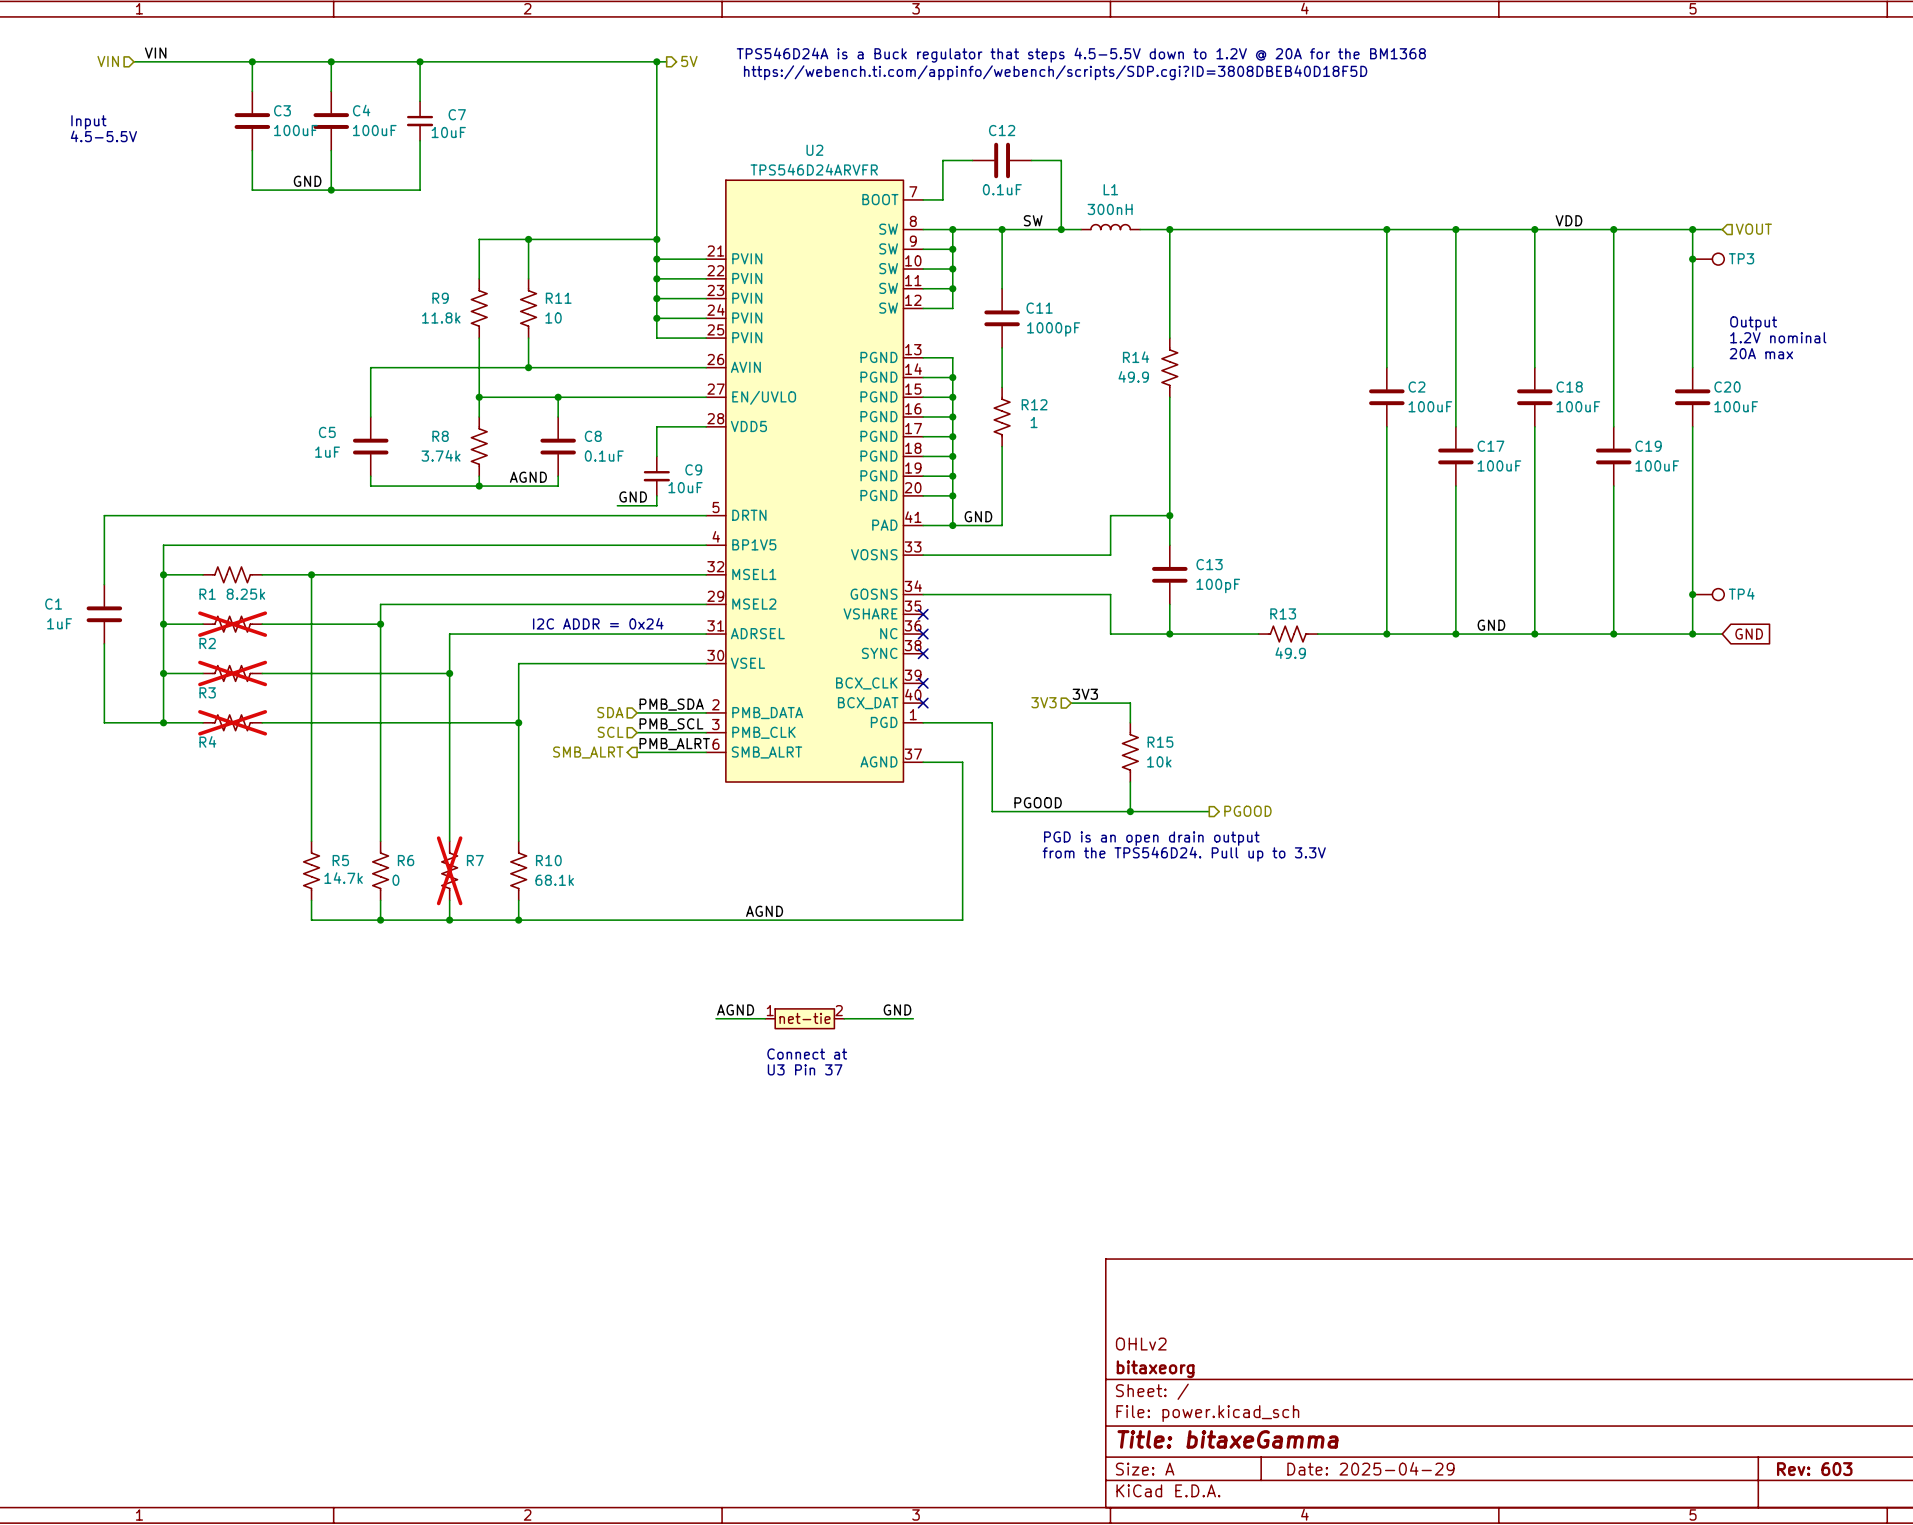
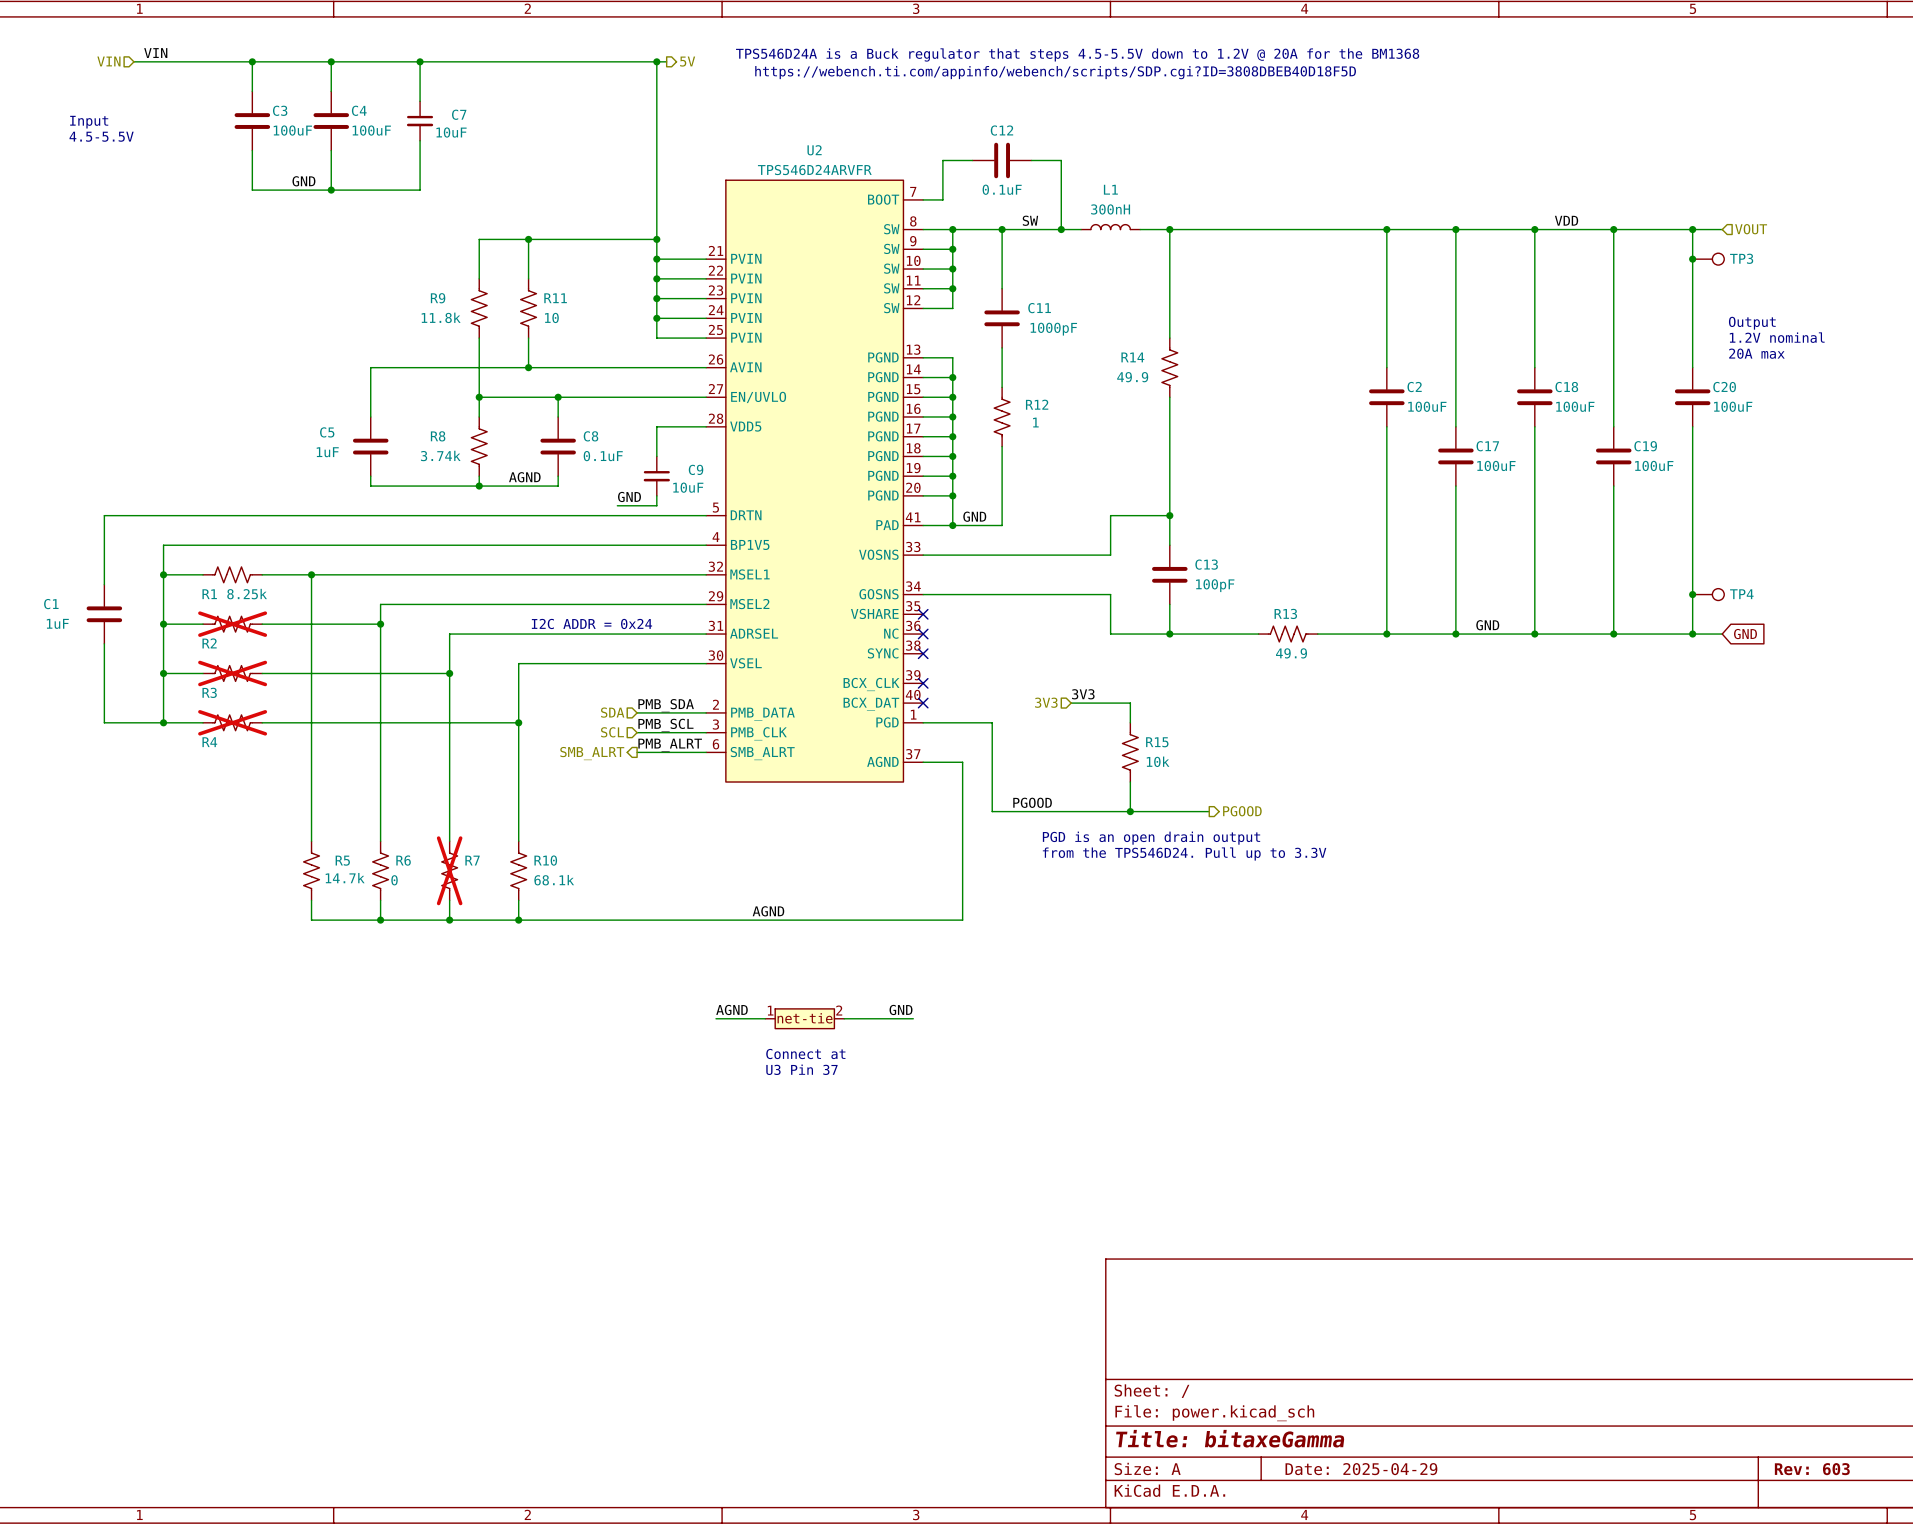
title block: OHLv2 (1141, 1344) -> none
title block: bitaxeorg (1155, 1369) -> none

